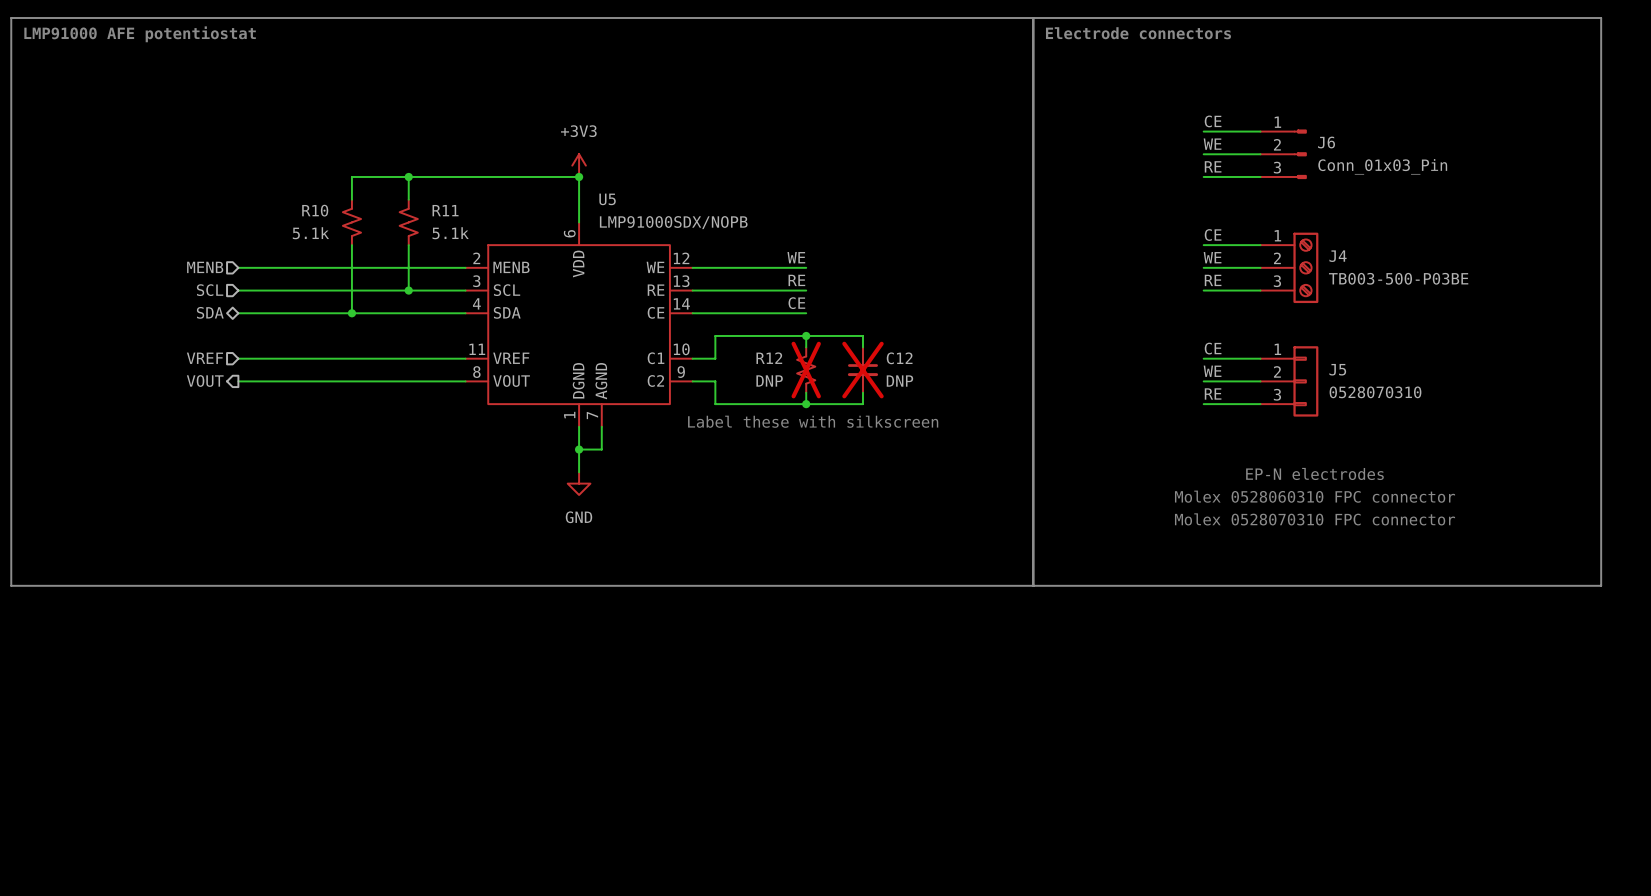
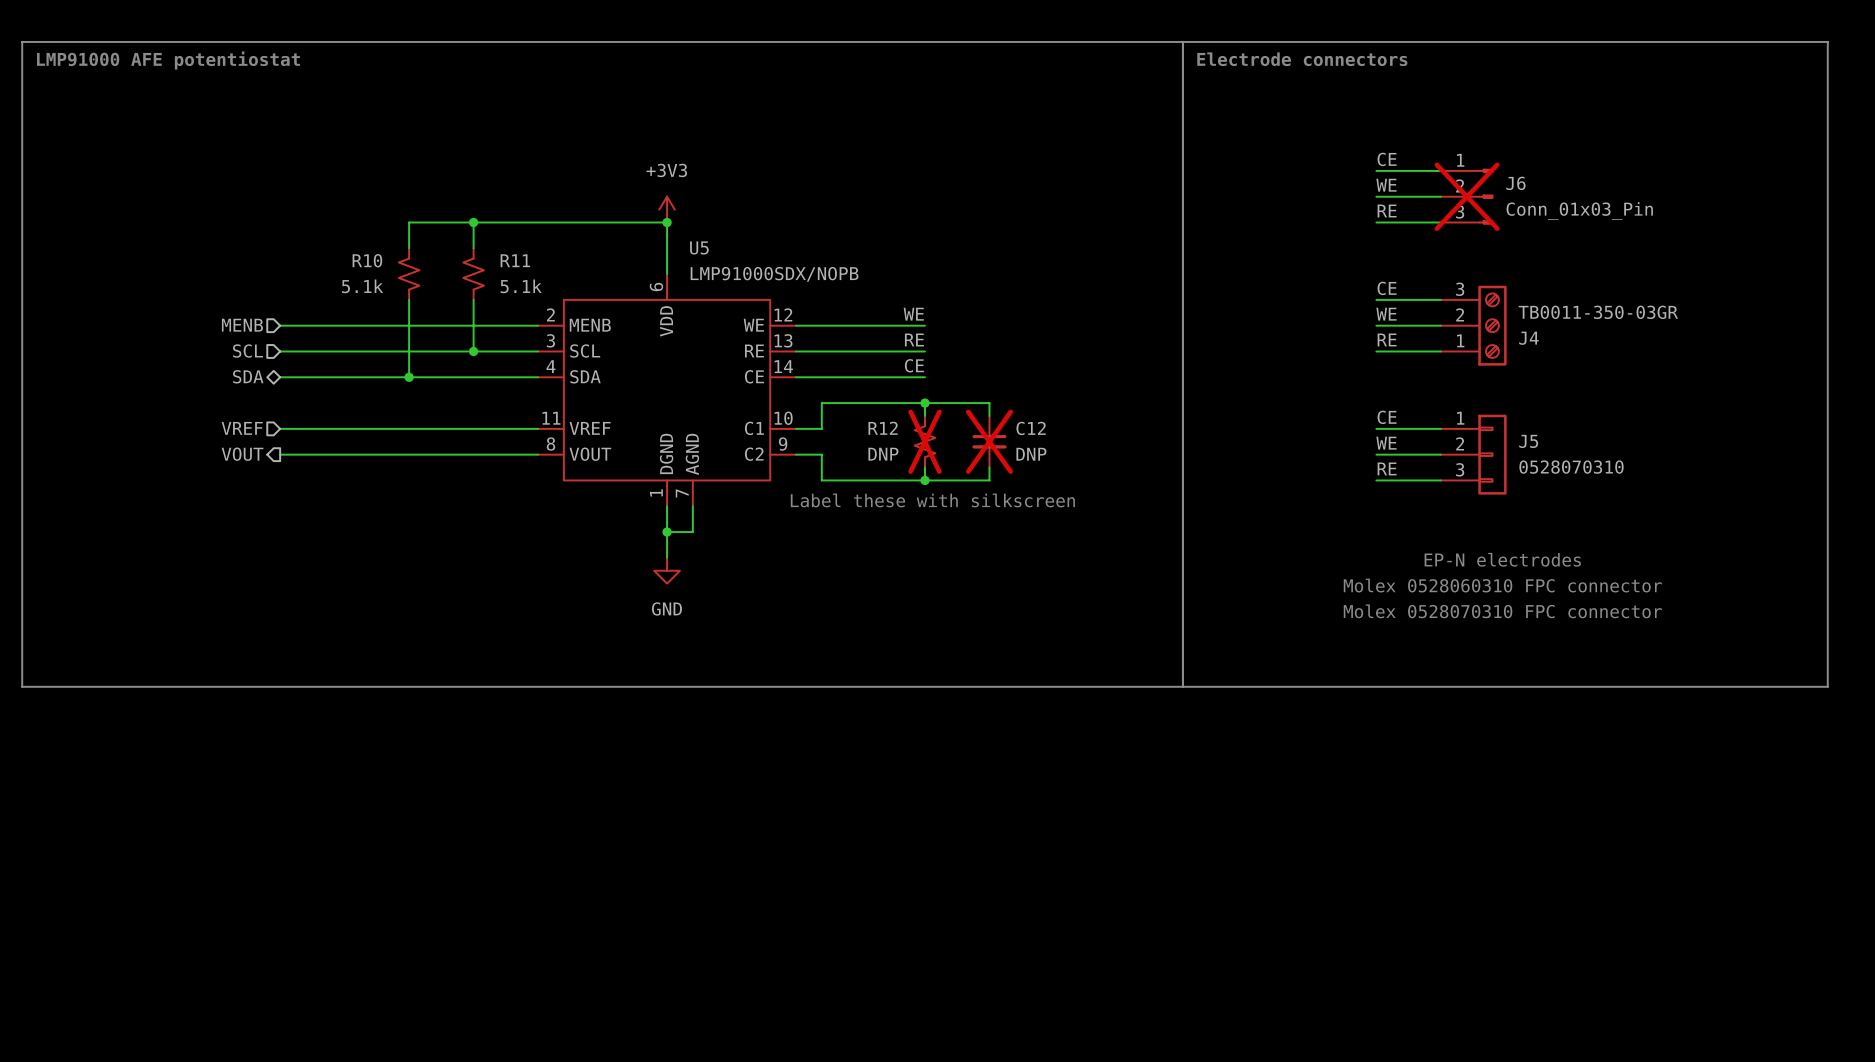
J6 do-not-place cross: none -> (1467, 196)
J4 flip: as is (1305, 267) -> up-down (1492, 325)
J4 value: TB003-500-P03BE (1398, 278) -> TB0011-350-03GR (1598, 312)

